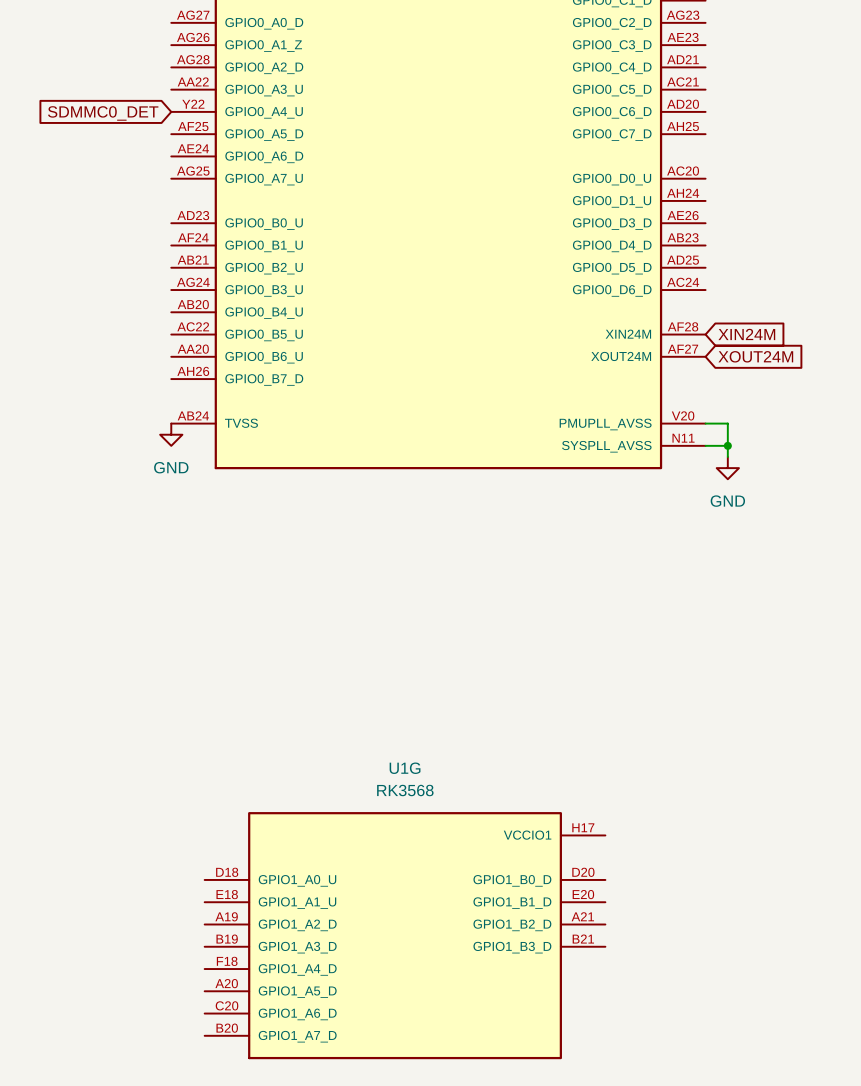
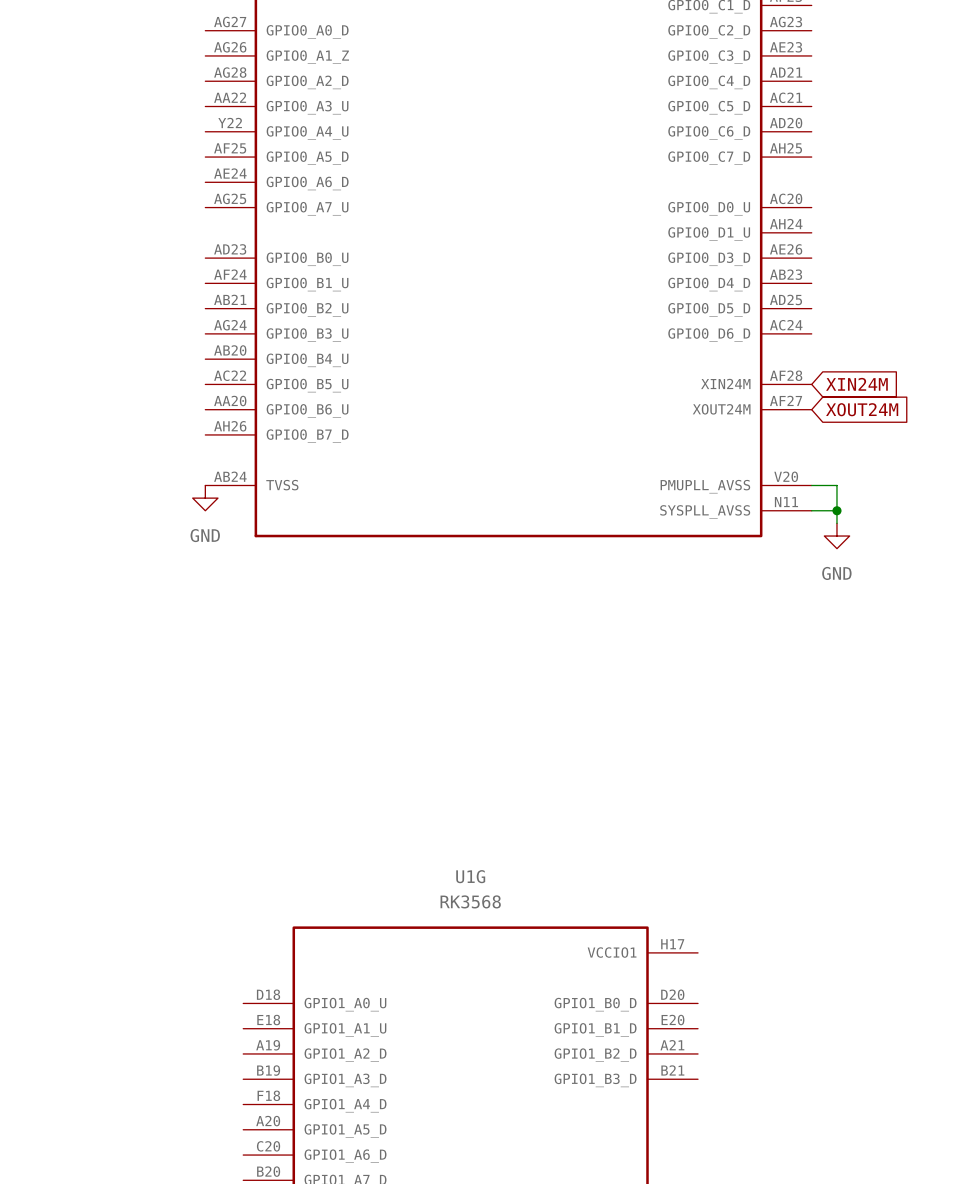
global label: SDMMC0_DET (103, 113) -> none

